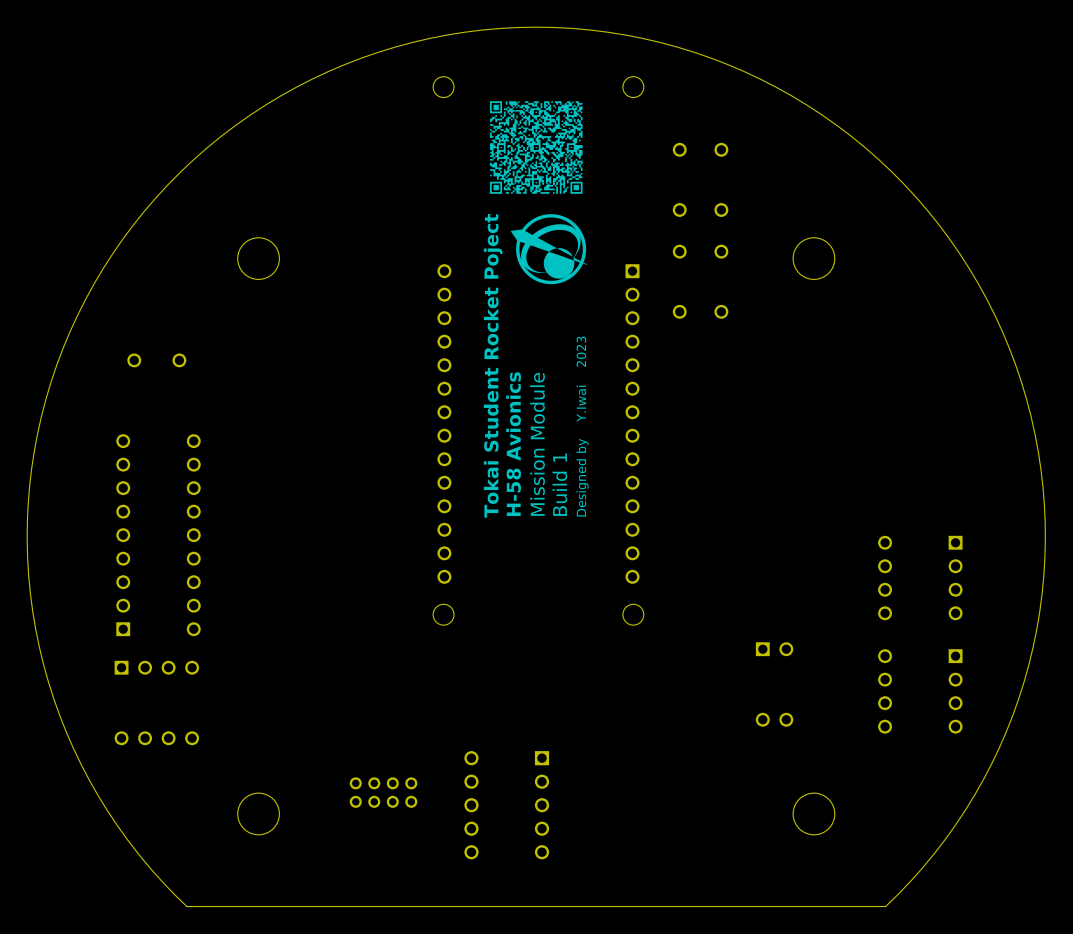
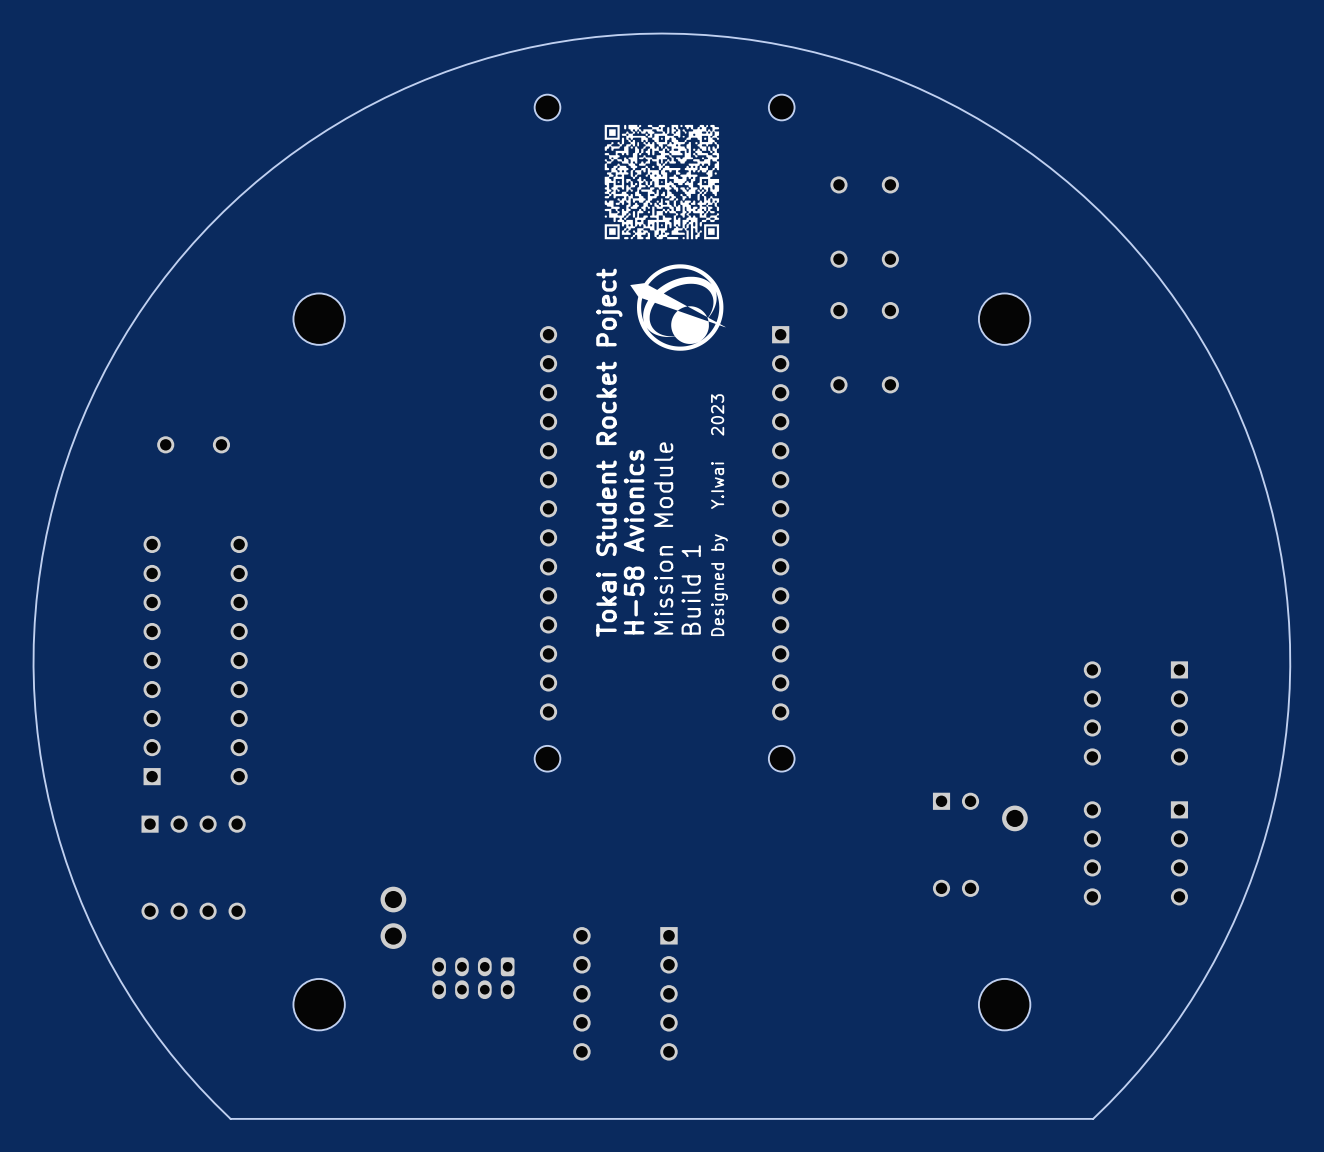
part: none -> (1014, 818)
part: none -> (393, 899)
part: none -> (393, 936)
part footprint: [349, 777, 418, 808] -> [432, 957, 515, 1000]

